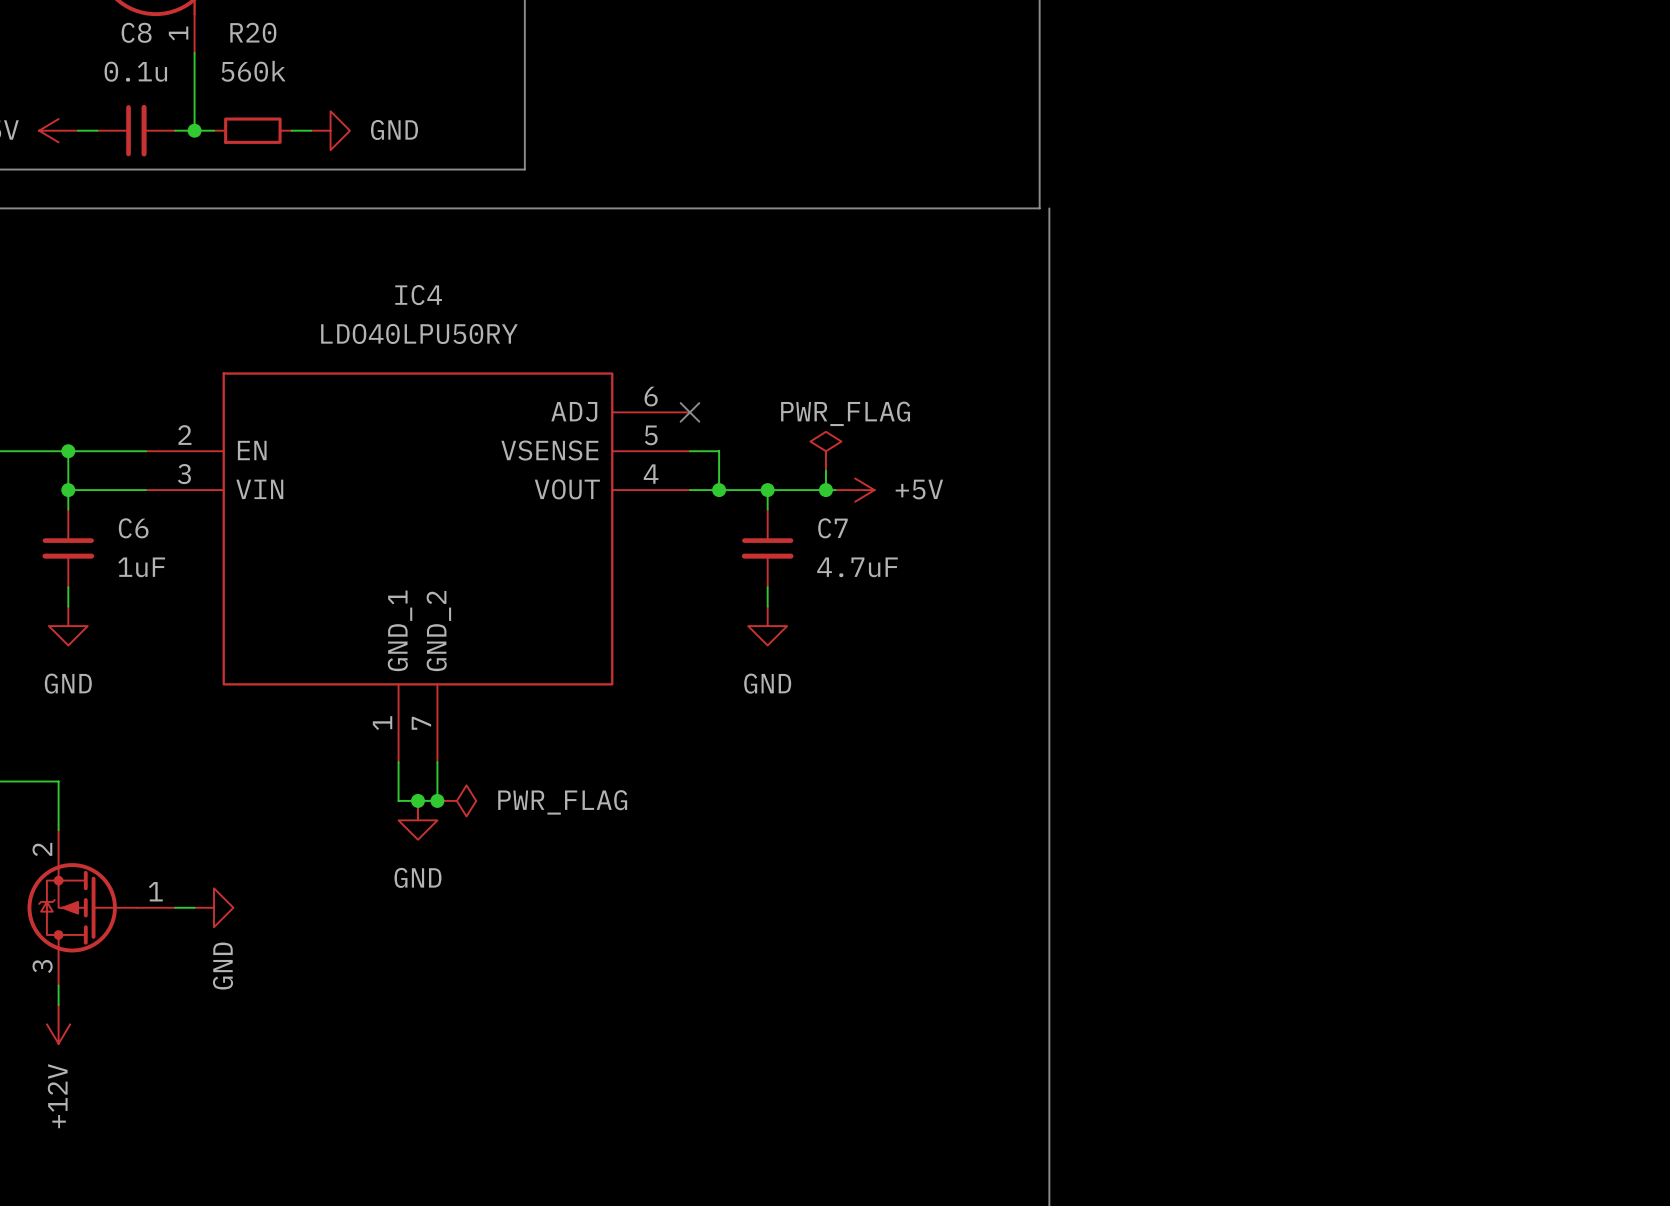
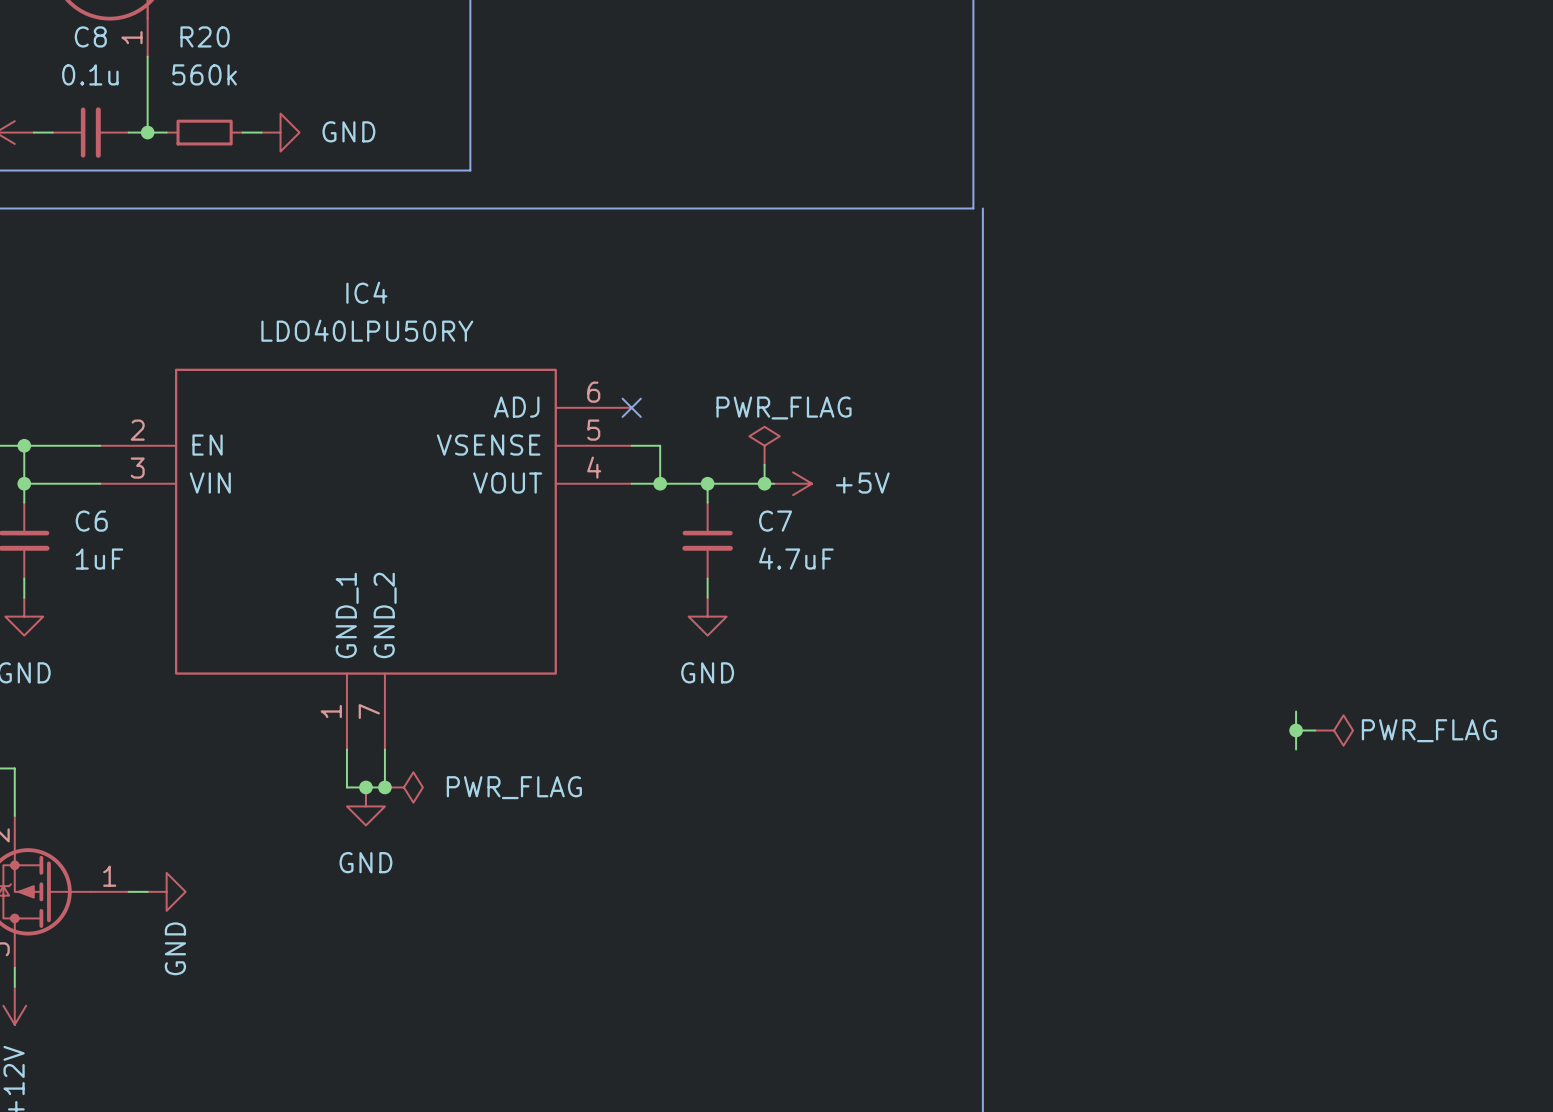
wire: none -> (1296, 711) (1296, 749)
wire: none -> (1296, 730) (1315, 730)
junction: none -> (1296, 730)
power symbol: none -> PWR_FLAG (1334, 730)

